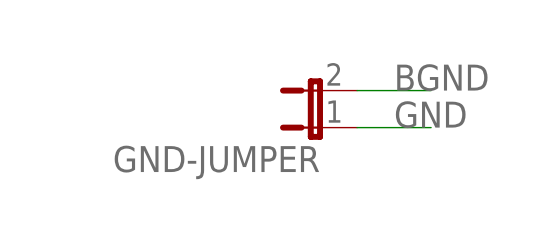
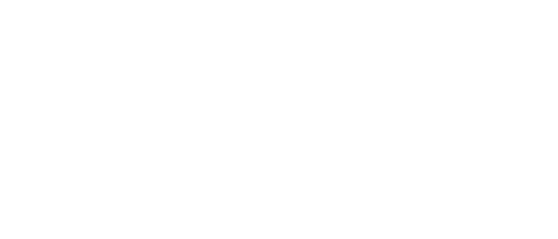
label: BGND (442, 77) -> none
wire: (357, 90) (431, 90) -> none
GND-JUMPER: (318, 109) -> none
label: GND (430, 114) -> none
wire: (357, 127) (431, 127) -> none

